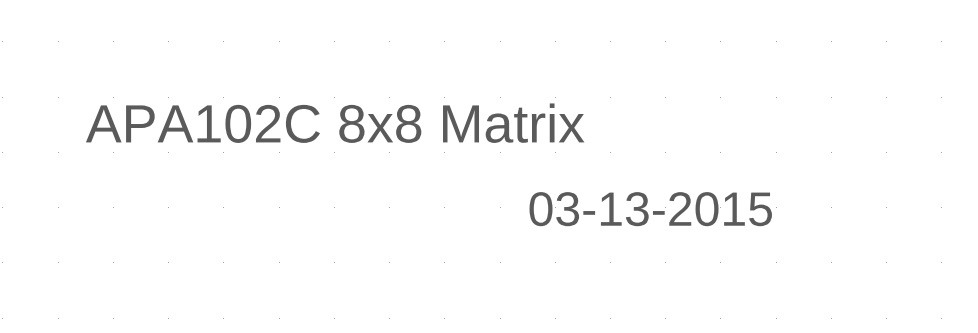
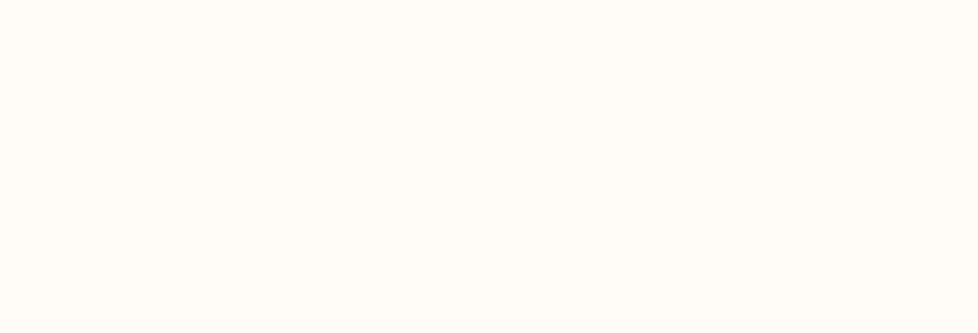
text: APA102C 8x8 Matrix (335, 123) -> none
text: 03-13-2015 (650, 209) -> none

